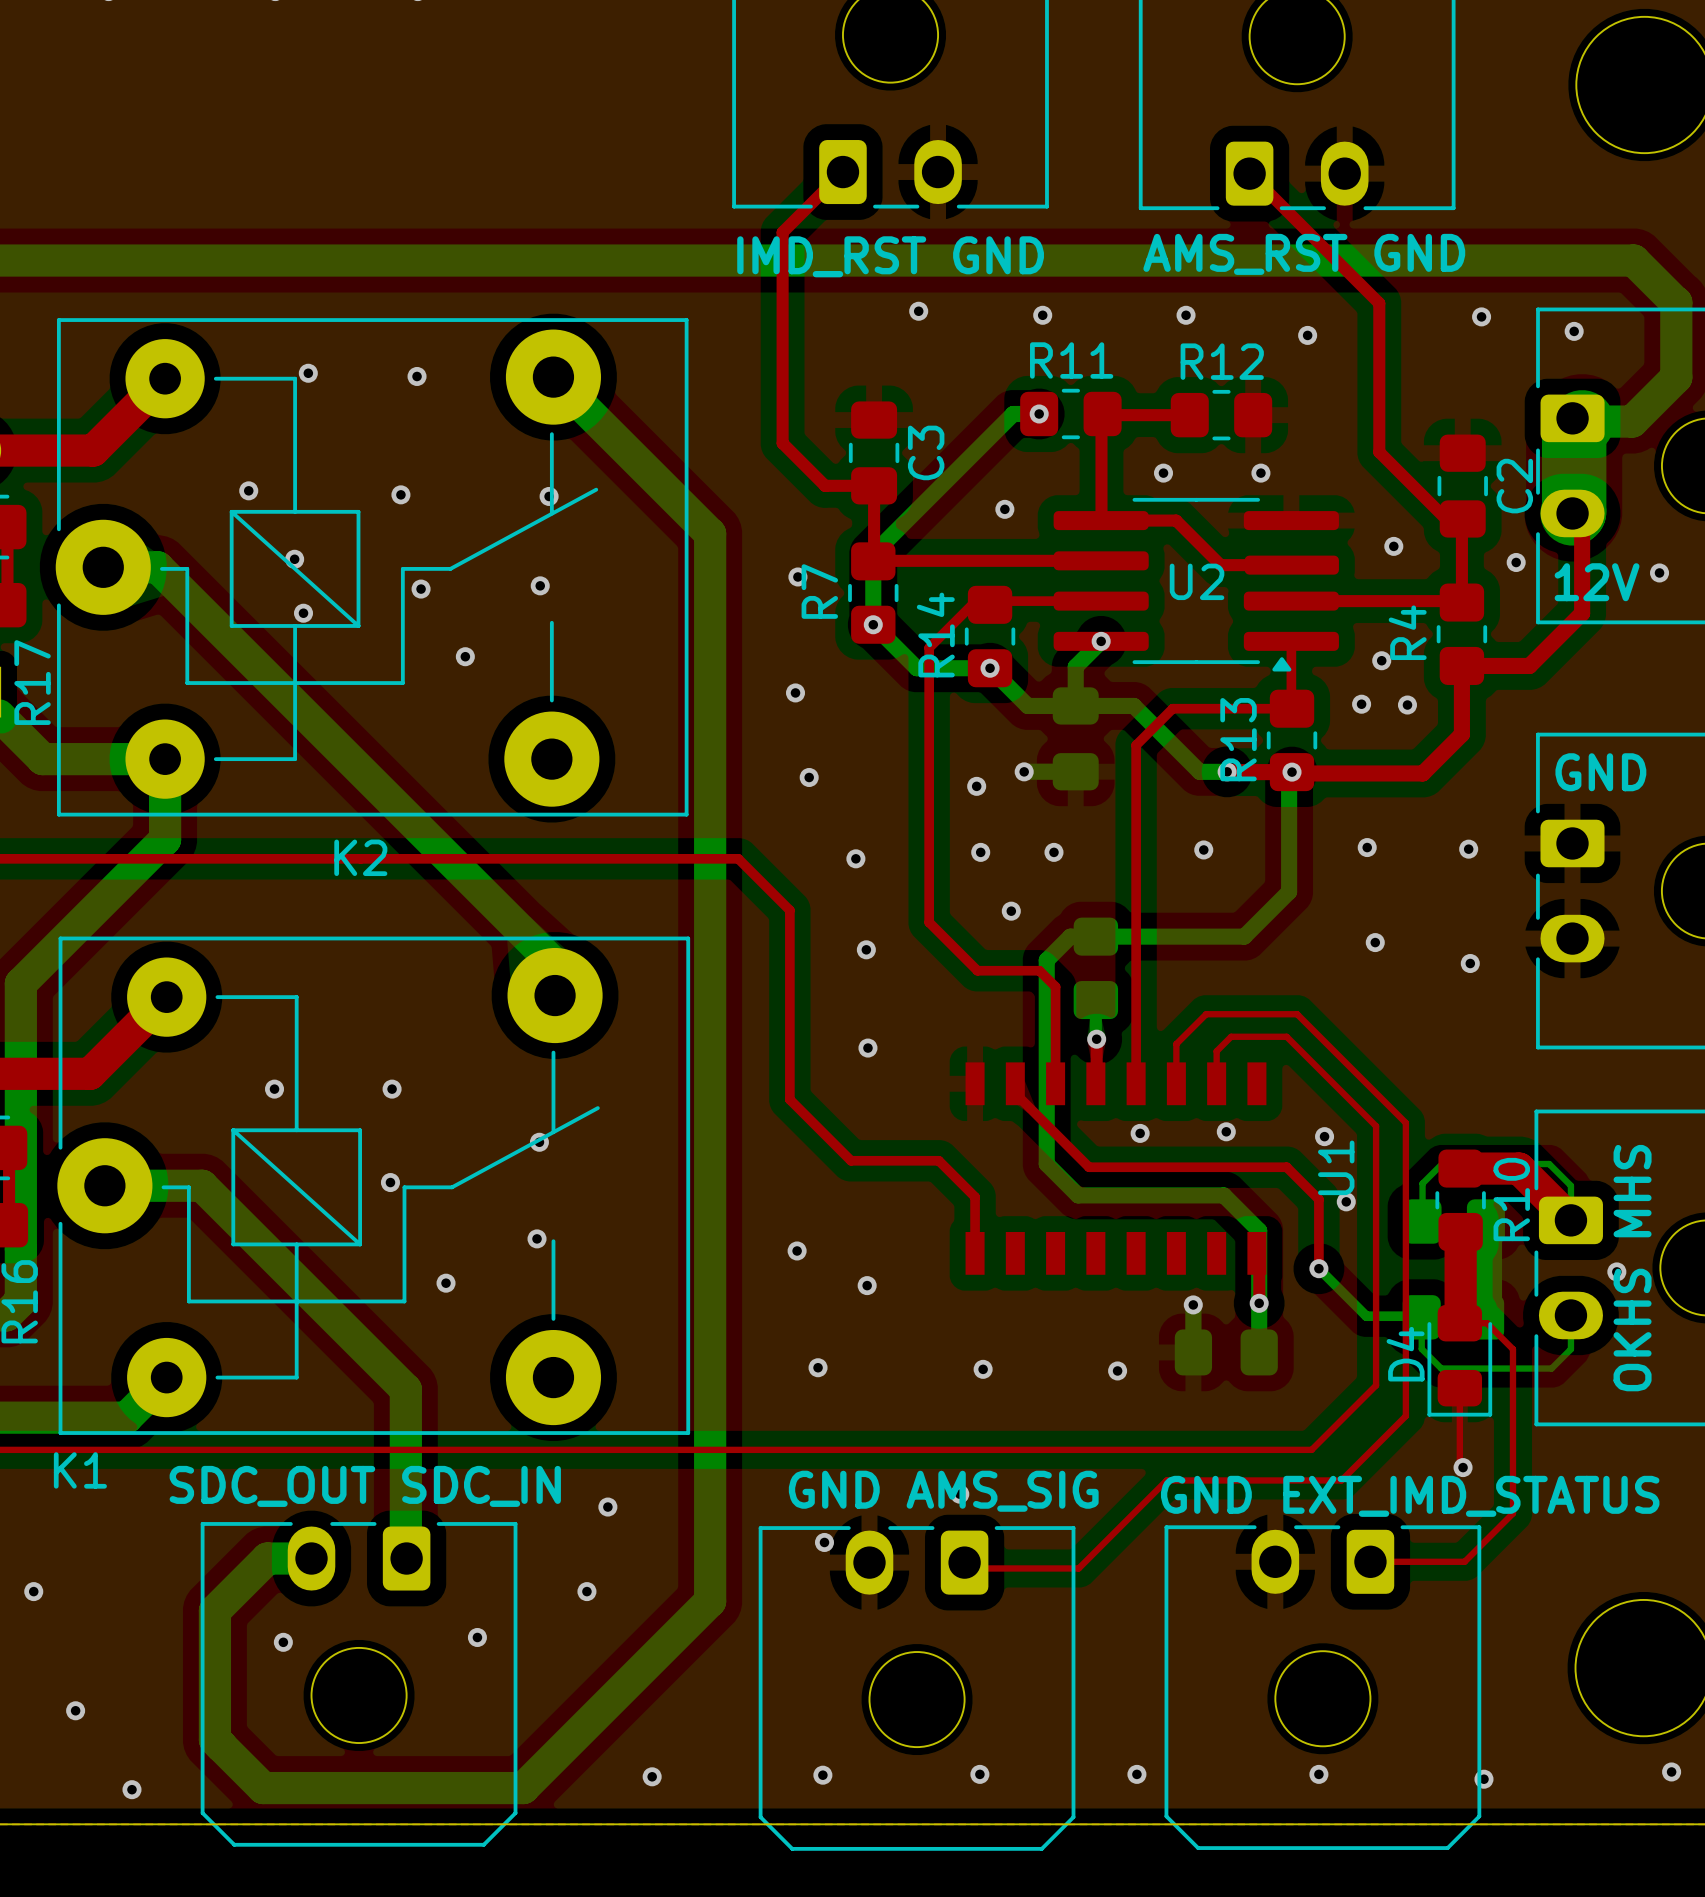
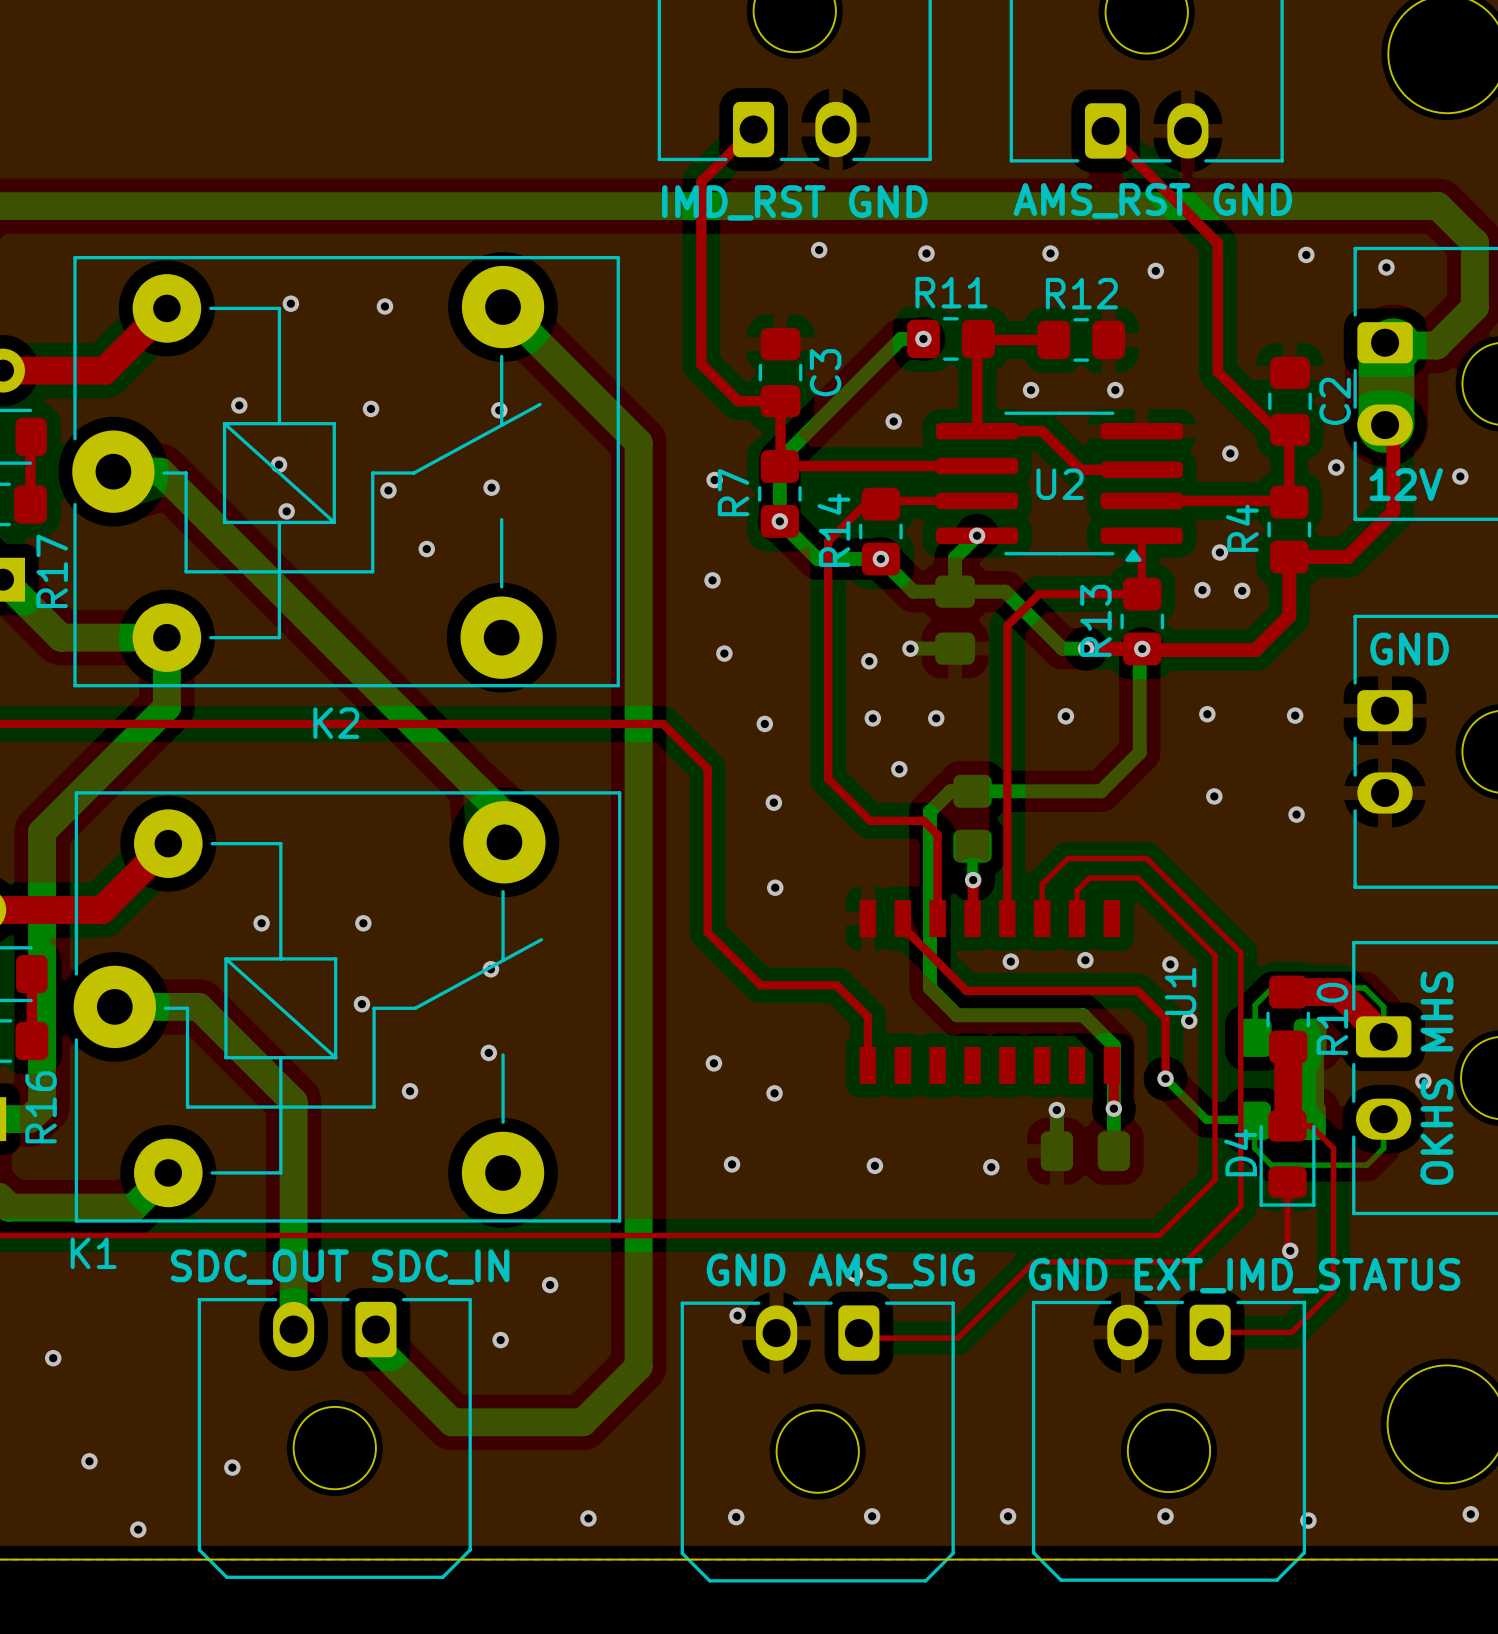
bottom track: (311, 1295) (405, 1389) (405, 1556) -> (293, 1101) (293, 1329)
bottom track: (312, 1558) (267, 1558) (214, 1610) (214, 1739) (263, 1788) (523, 1788) (645, 1665) -> (375, 1329) (375, 1346) (451, 1422) (582, 1422)
via position: (586, 1591) -> (500, 1340)
via: (477, 1637) -> none
via position: (283, 1642) -> (232, 1467)

